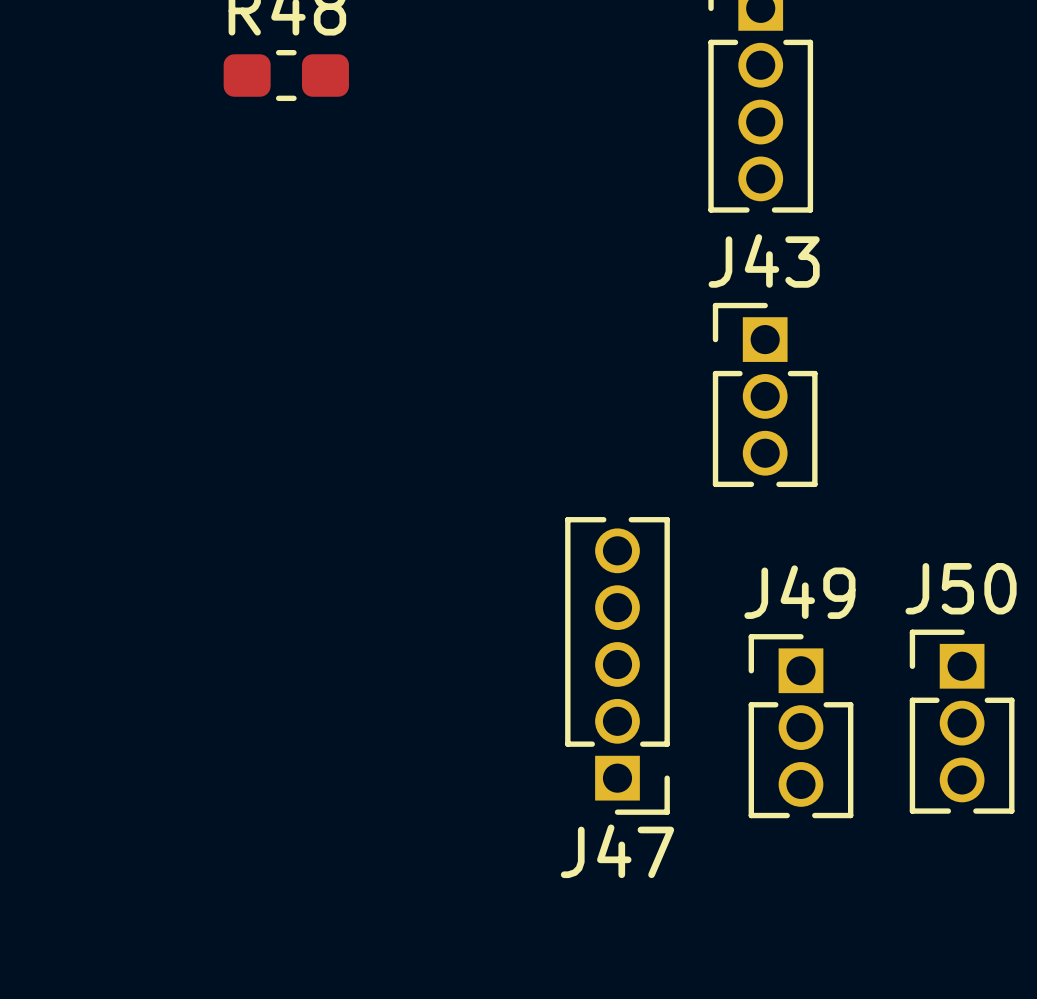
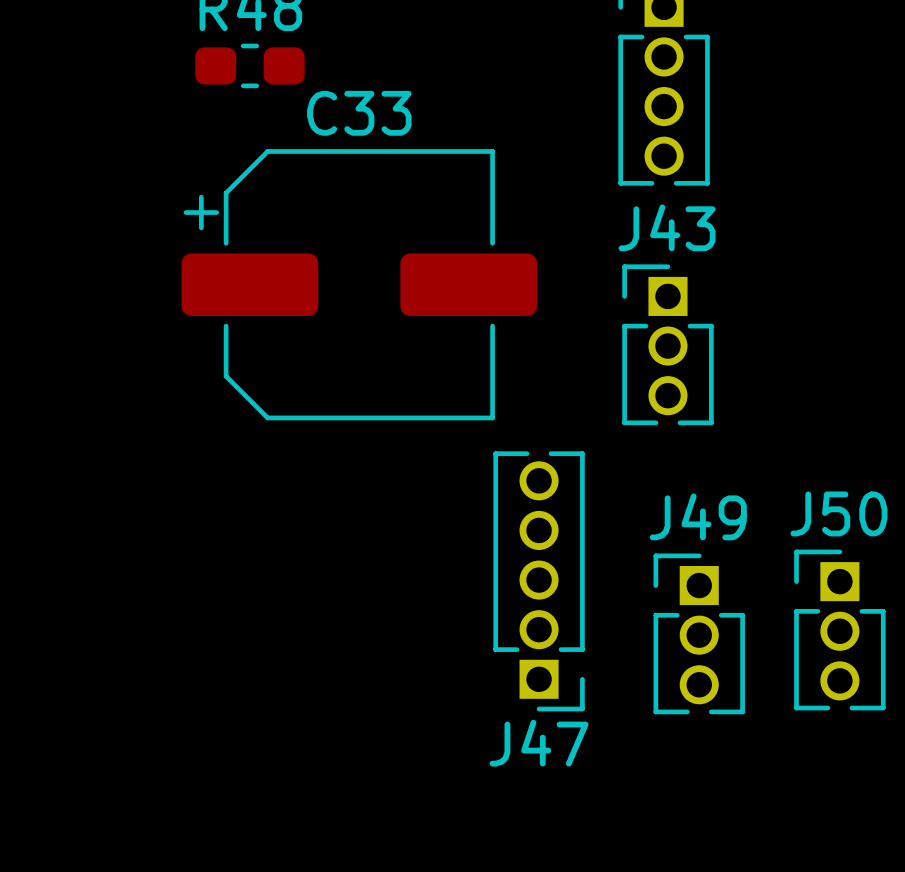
C33: none -> (359, 284)

